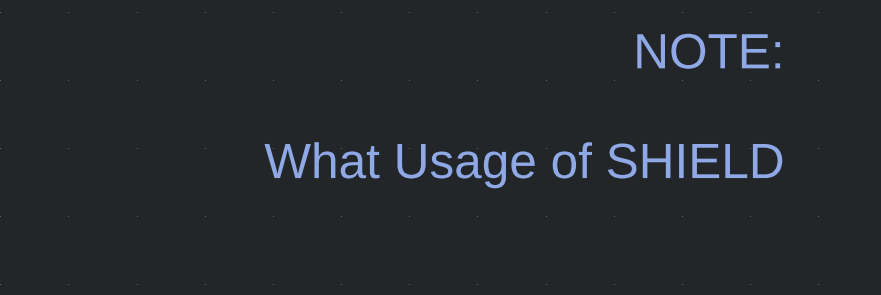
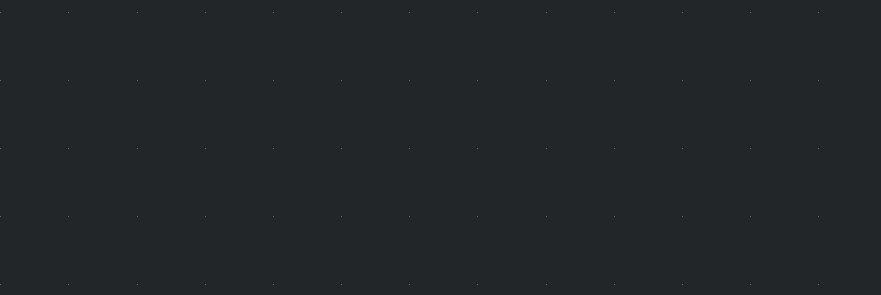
text: NOTE: (708, 51) -> none
text: What Usage of SHIELD (523, 165) -> none

